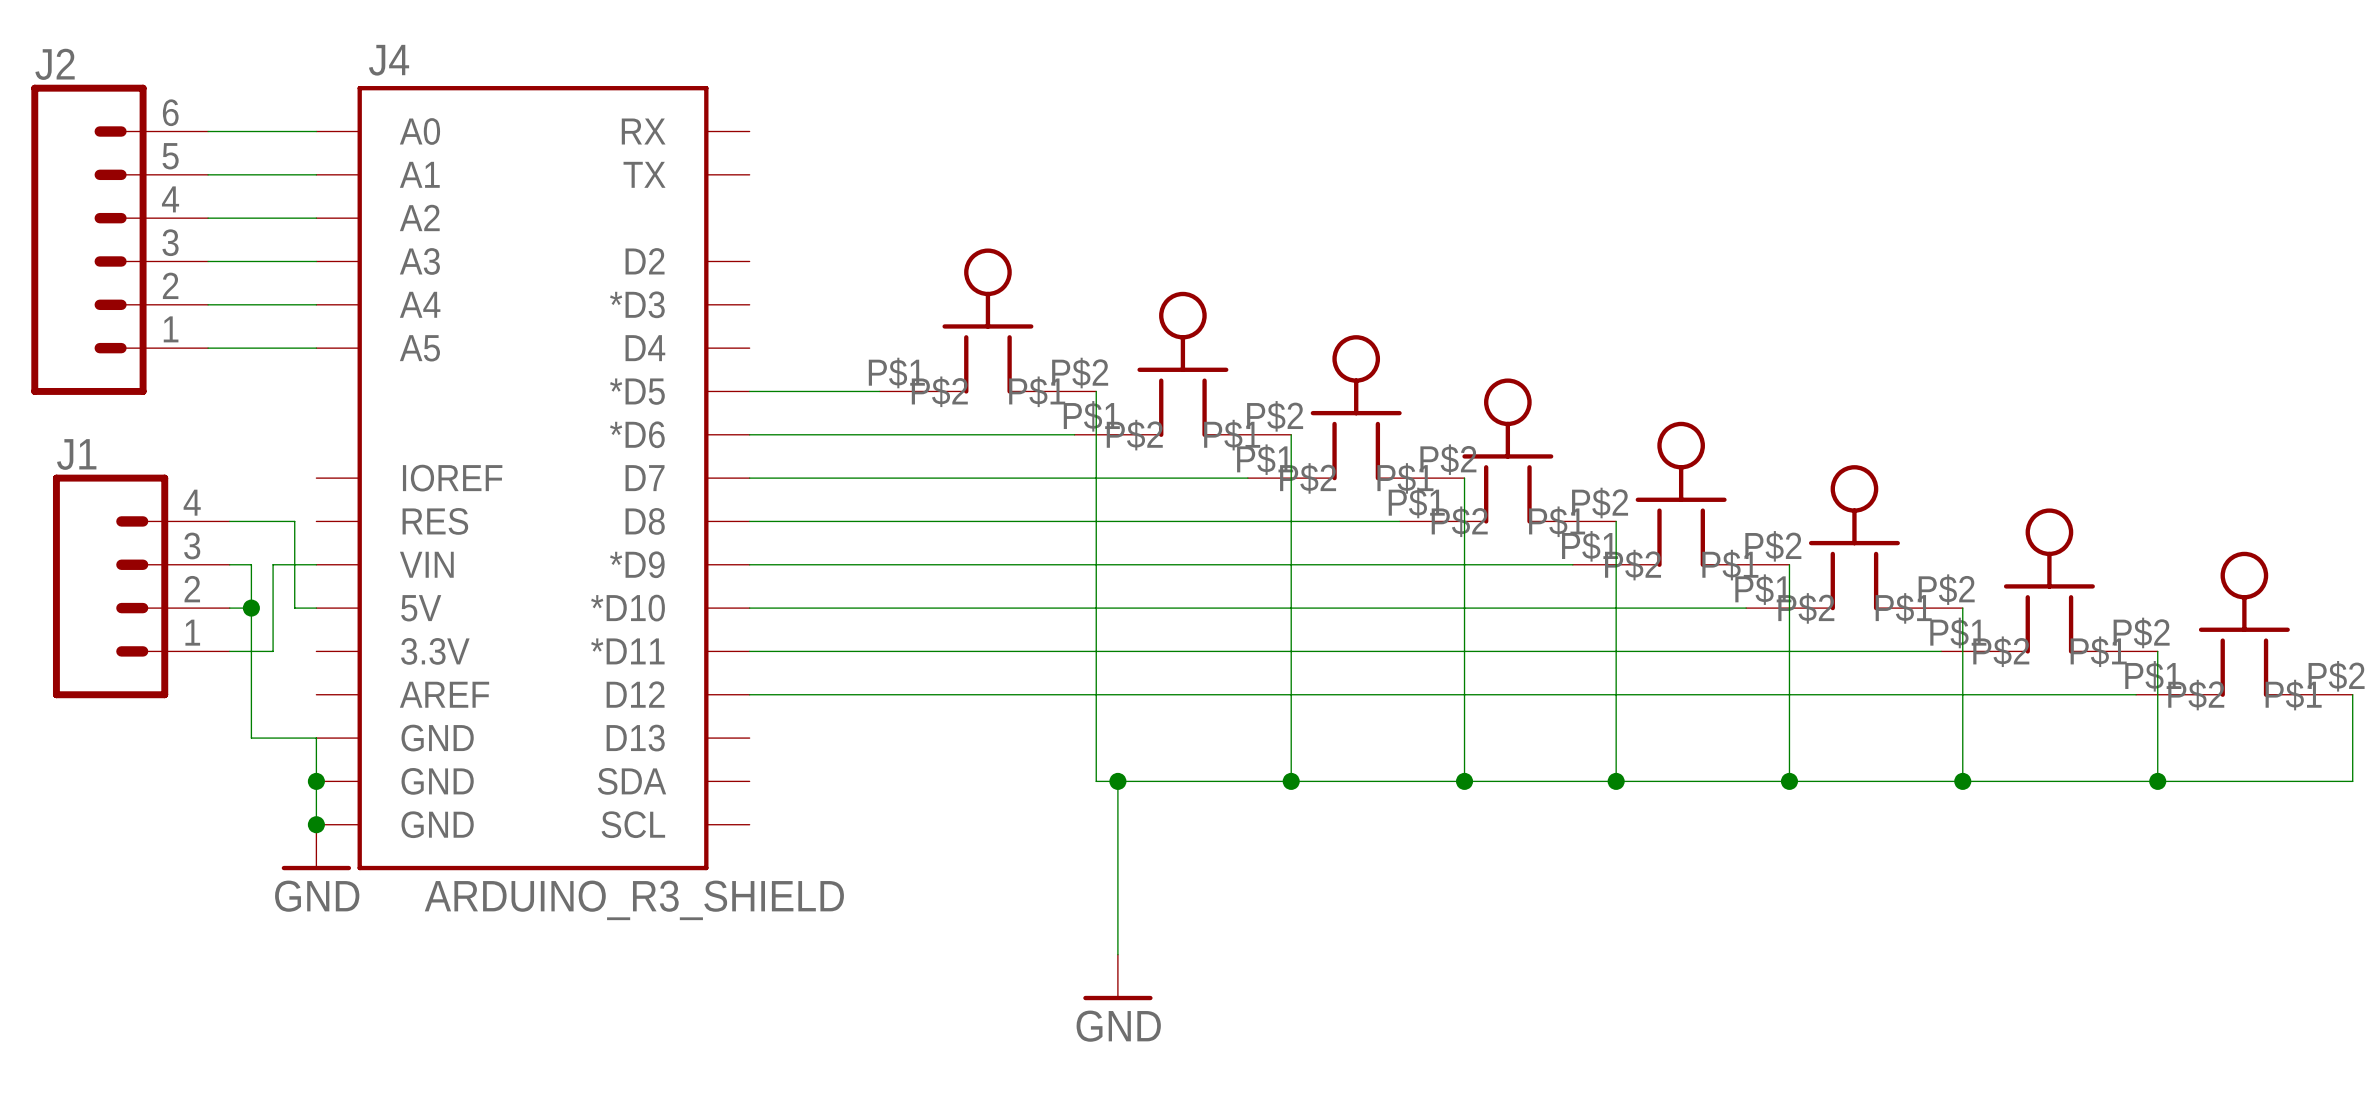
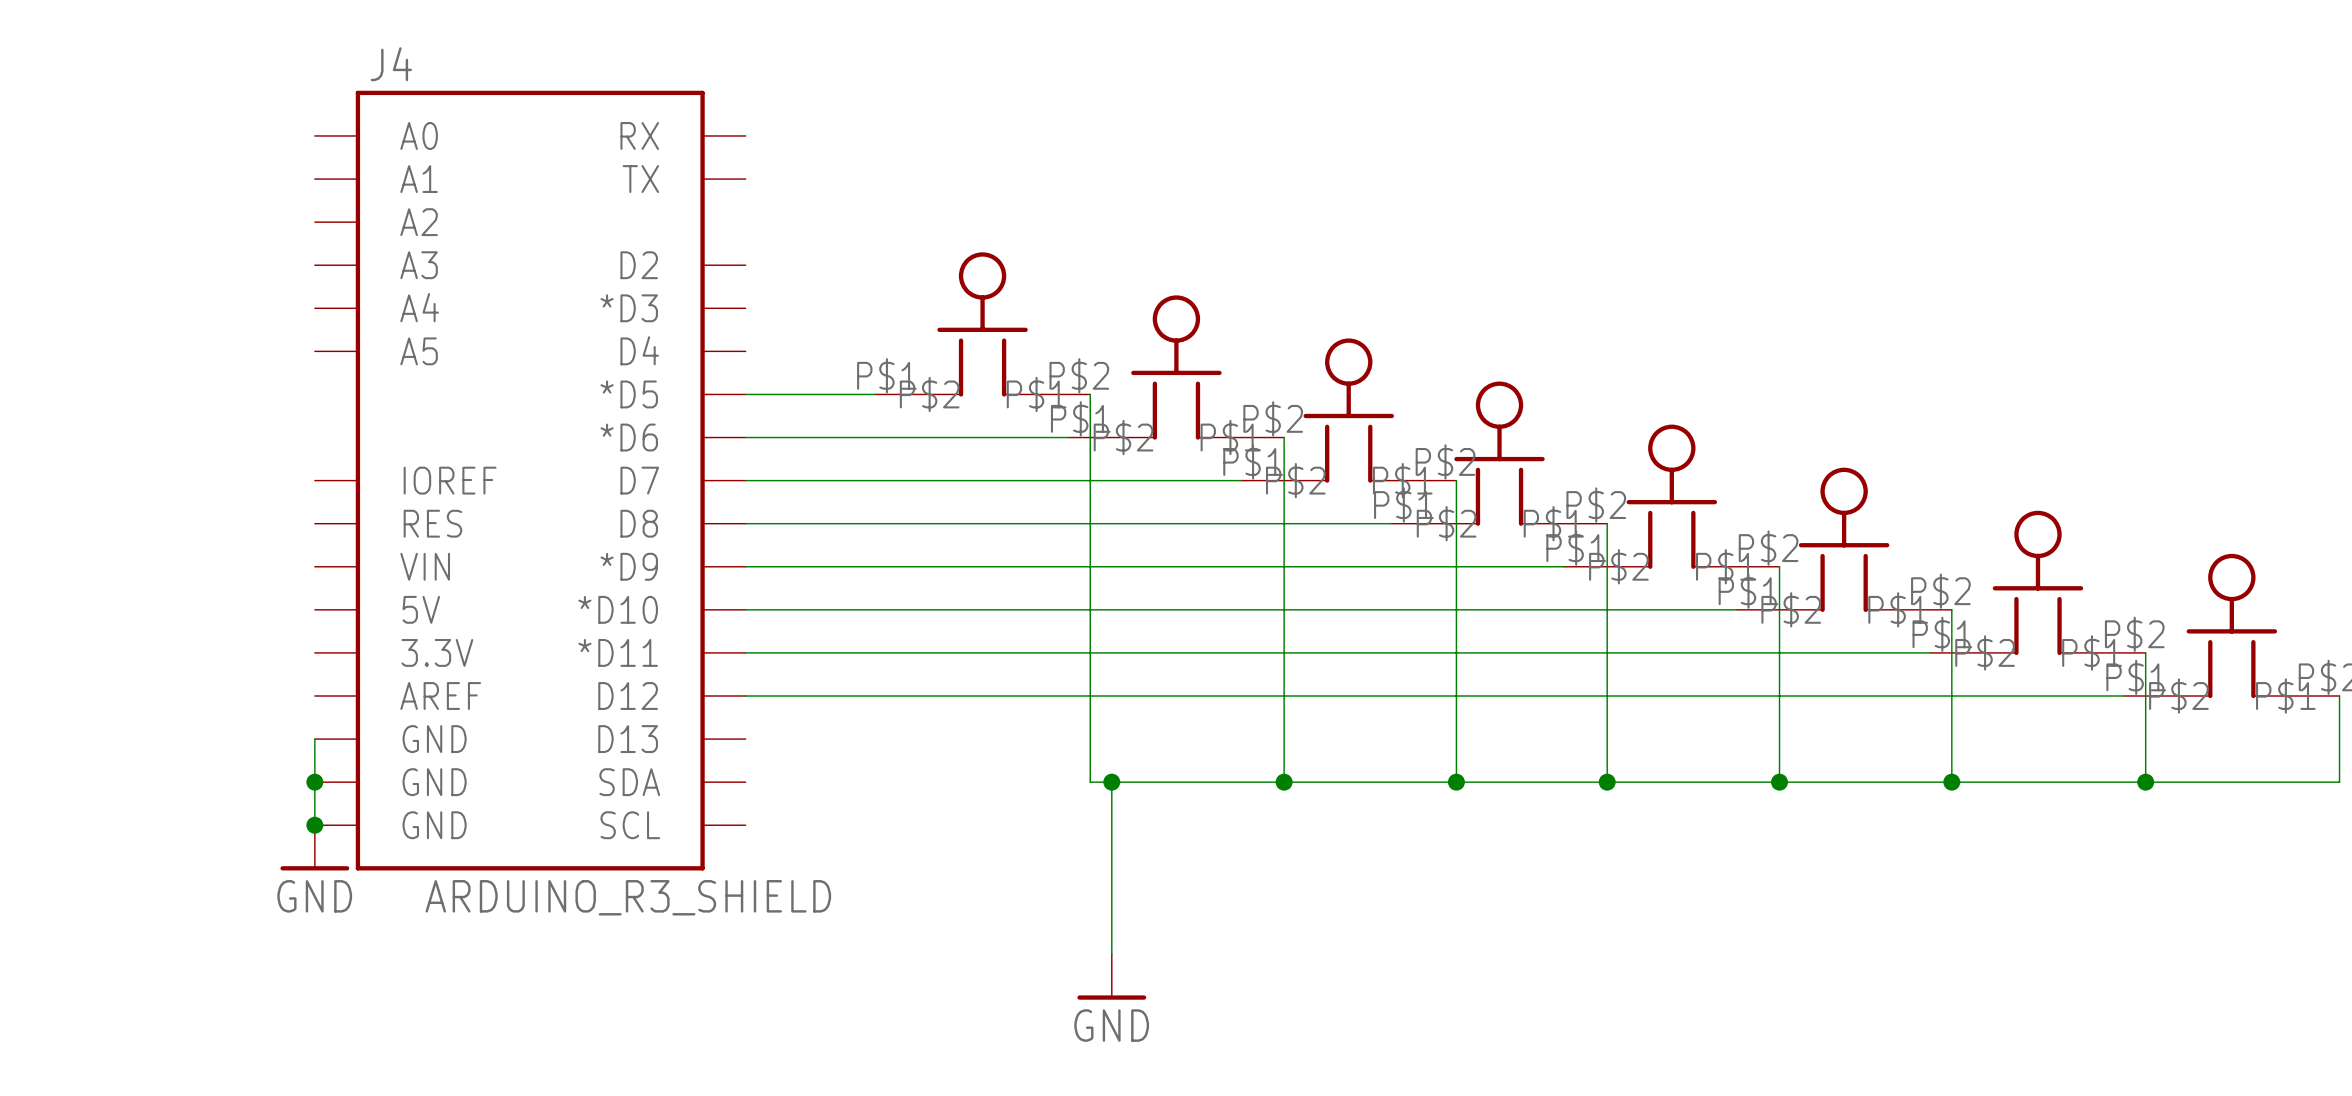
wire: (208, 131) (316, 131) -> none
wire: (208, 174) (316, 174) -> none
wire: (208, 218) (316, 218) -> none
J2: (119, 239) -> none
wire: (208, 261) (316, 261) -> none
wire: (208, 304) (316, 304) -> none
wire: (208, 348) (316, 348) -> none
wire: (229, 521) (294, 521) (294, 608) (316, 608) -> none
wire: (229, 564) (251, 564) (251, 738) (316, 738) -> none
wire: (316, 564) (273, 564) (273, 651) (229, 651) -> none
J1: (141, 586) -> none
wire: (229, 608) (251, 608) -> none
junction: (251, 608) -> none

